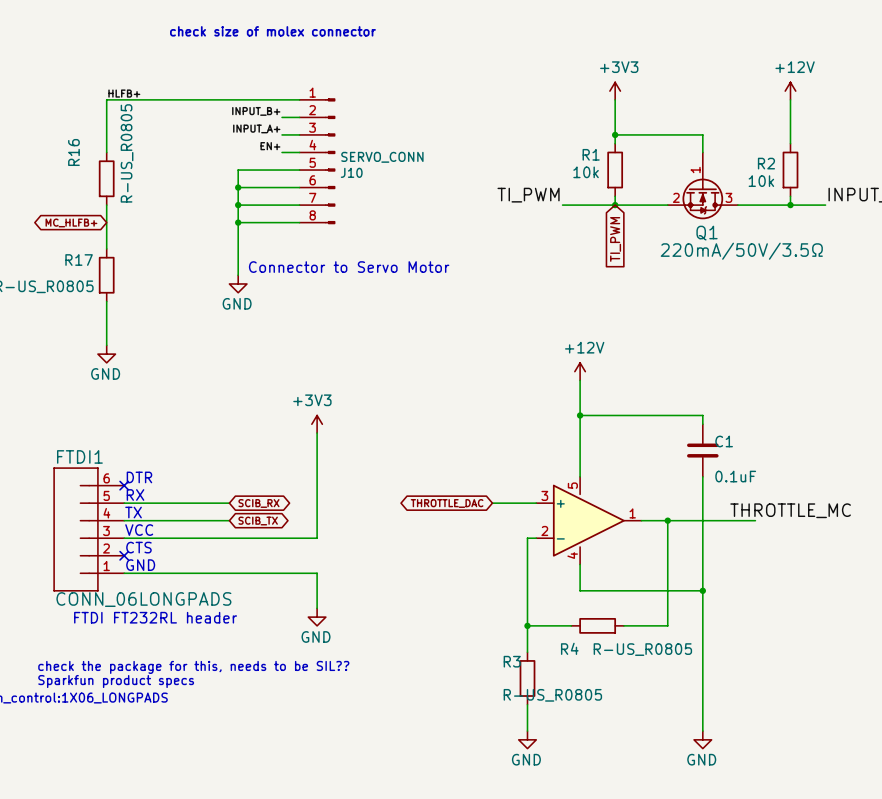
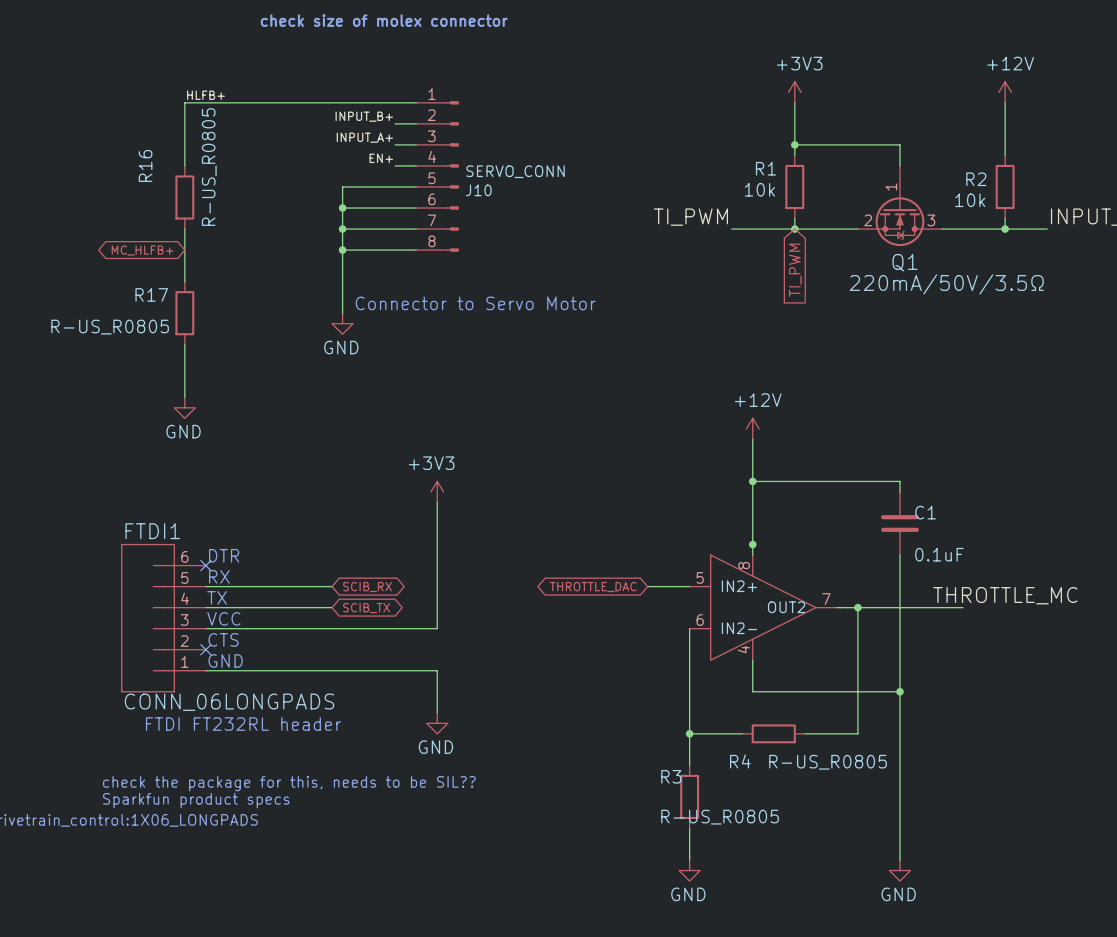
junction: none -> (752, 544)
part symbol: [536, 476, 642, 565] -> [689, 555, 837, 661]

